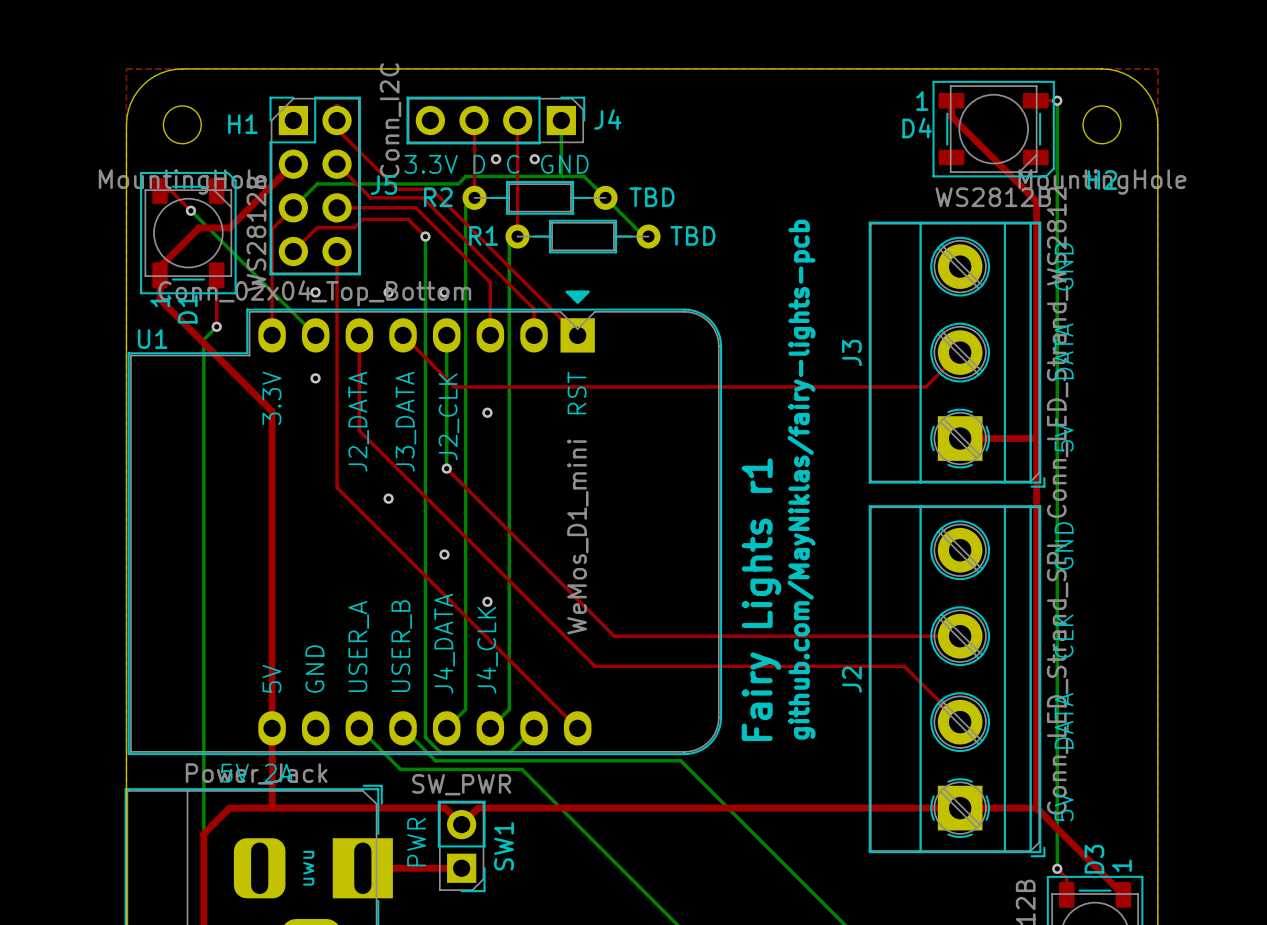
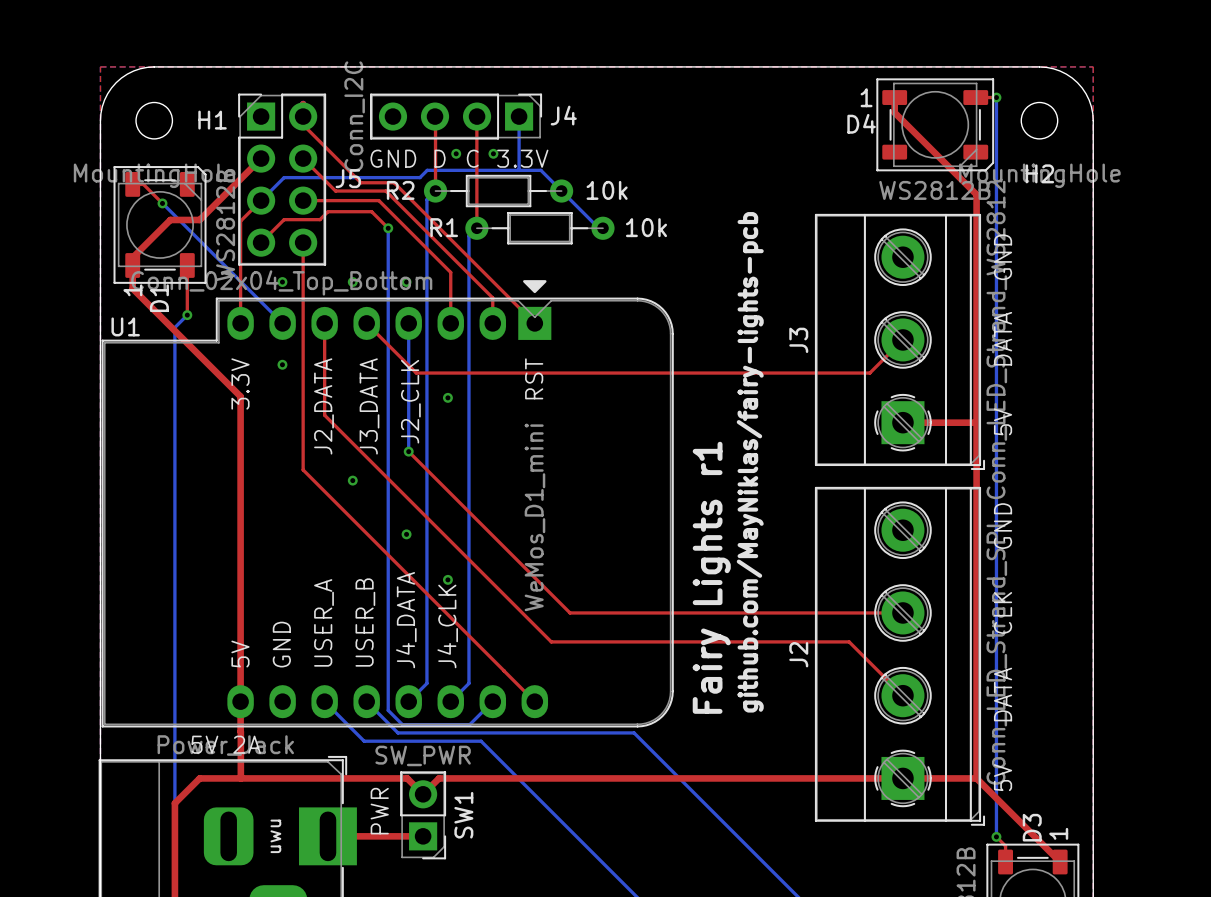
text: 3.3V (431, 164) -> GND (393, 158)
text: GND (564, 164) -> 3.3V (522, 158)
R2 value: TBD (651, 197) -> 10k (607, 190)
R1 value: TBD (692, 235) -> 10k (646, 227)

